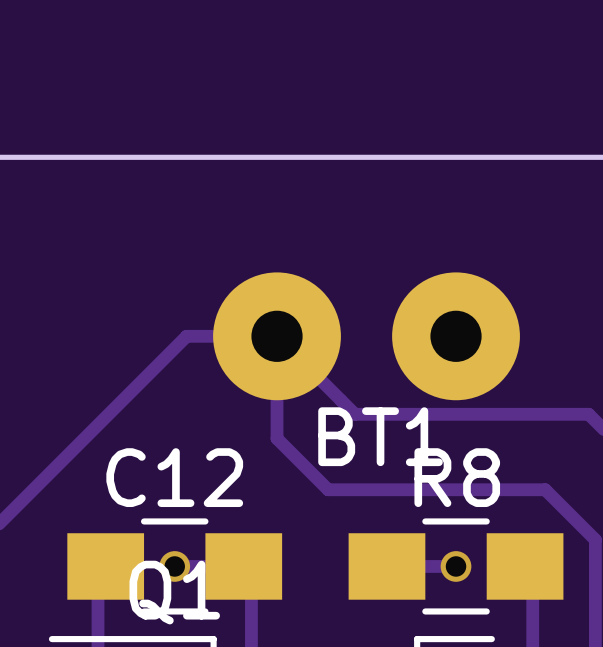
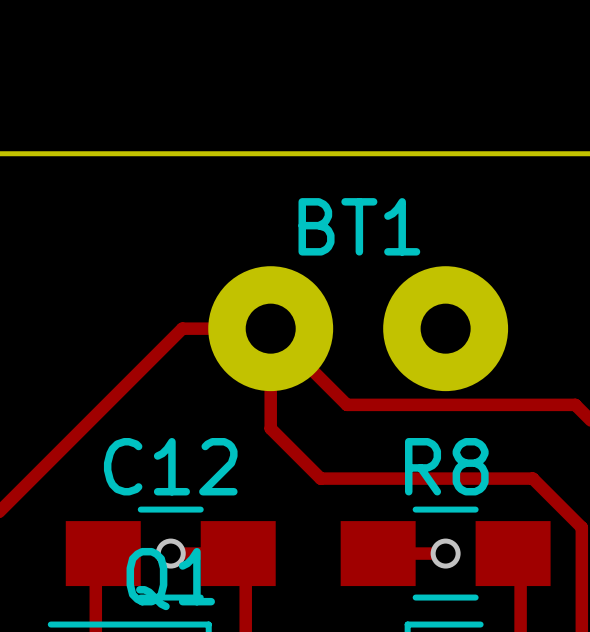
BT1 name position: BT1 (380, 436) -> BT1 (359, 226)

